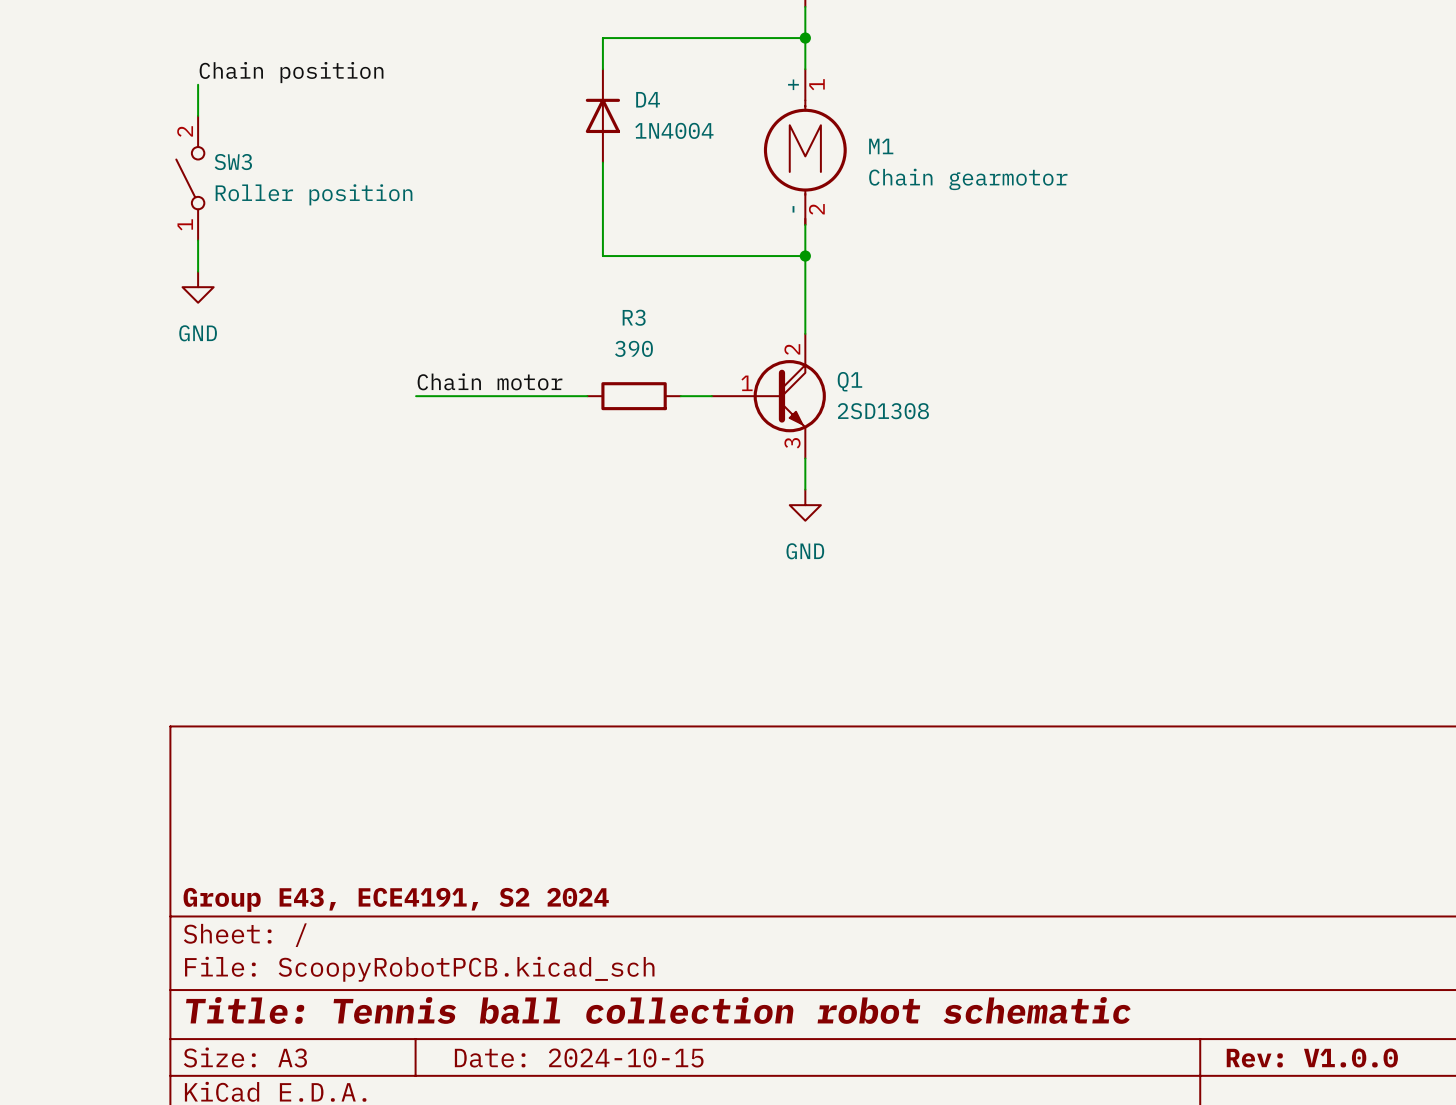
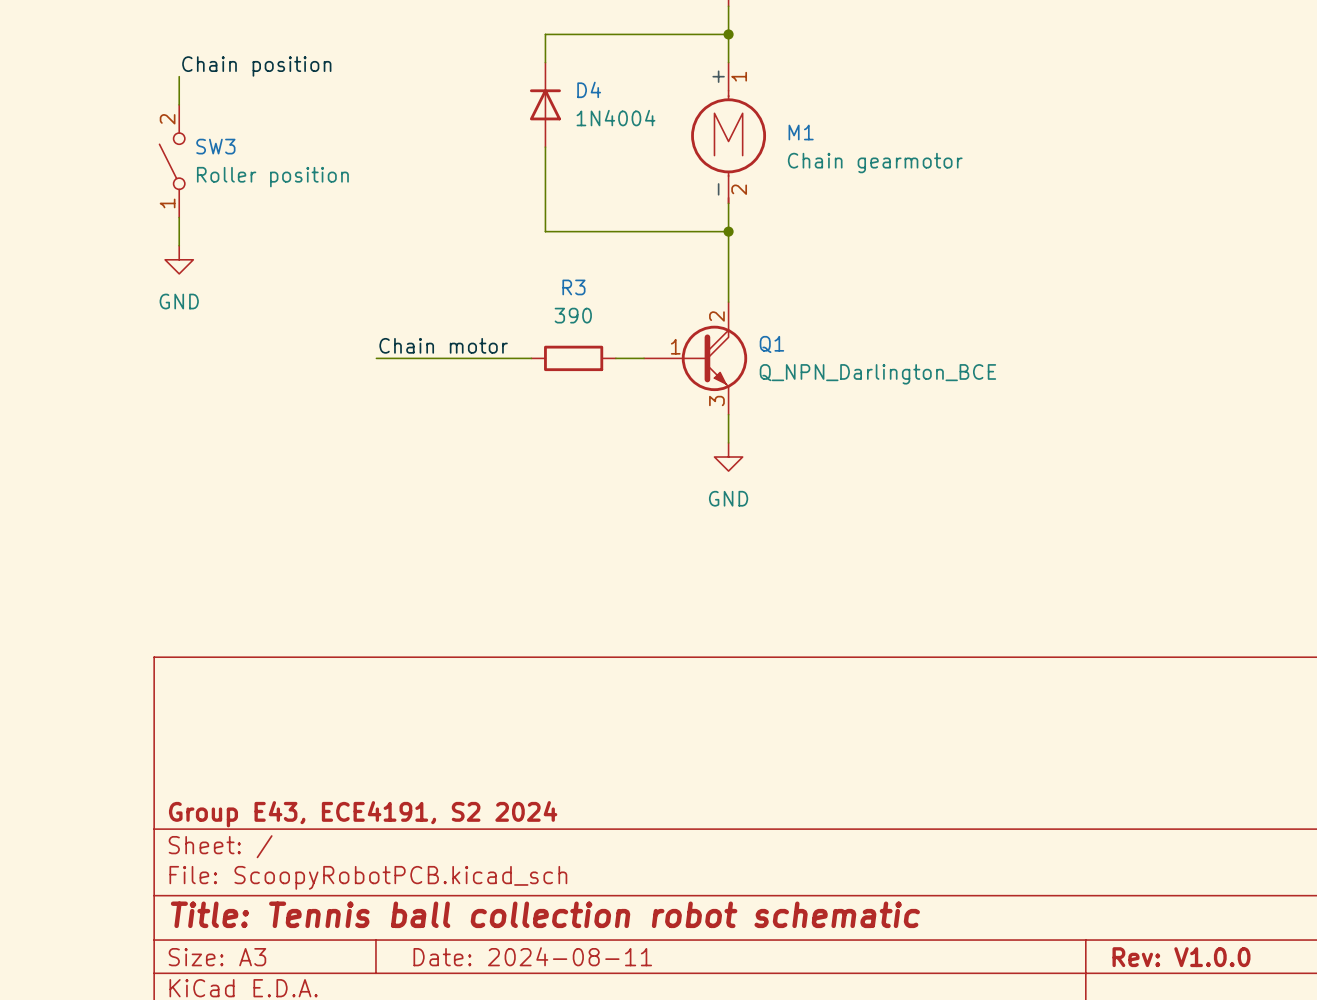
Q1 value: 2SD1308 (883, 411) -> Q_NPN_Darlington_BCE (877, 374)
title block: Date: 2024-10-15 (579, 1058) -> Date: 2024-08-11 (532, 956)

